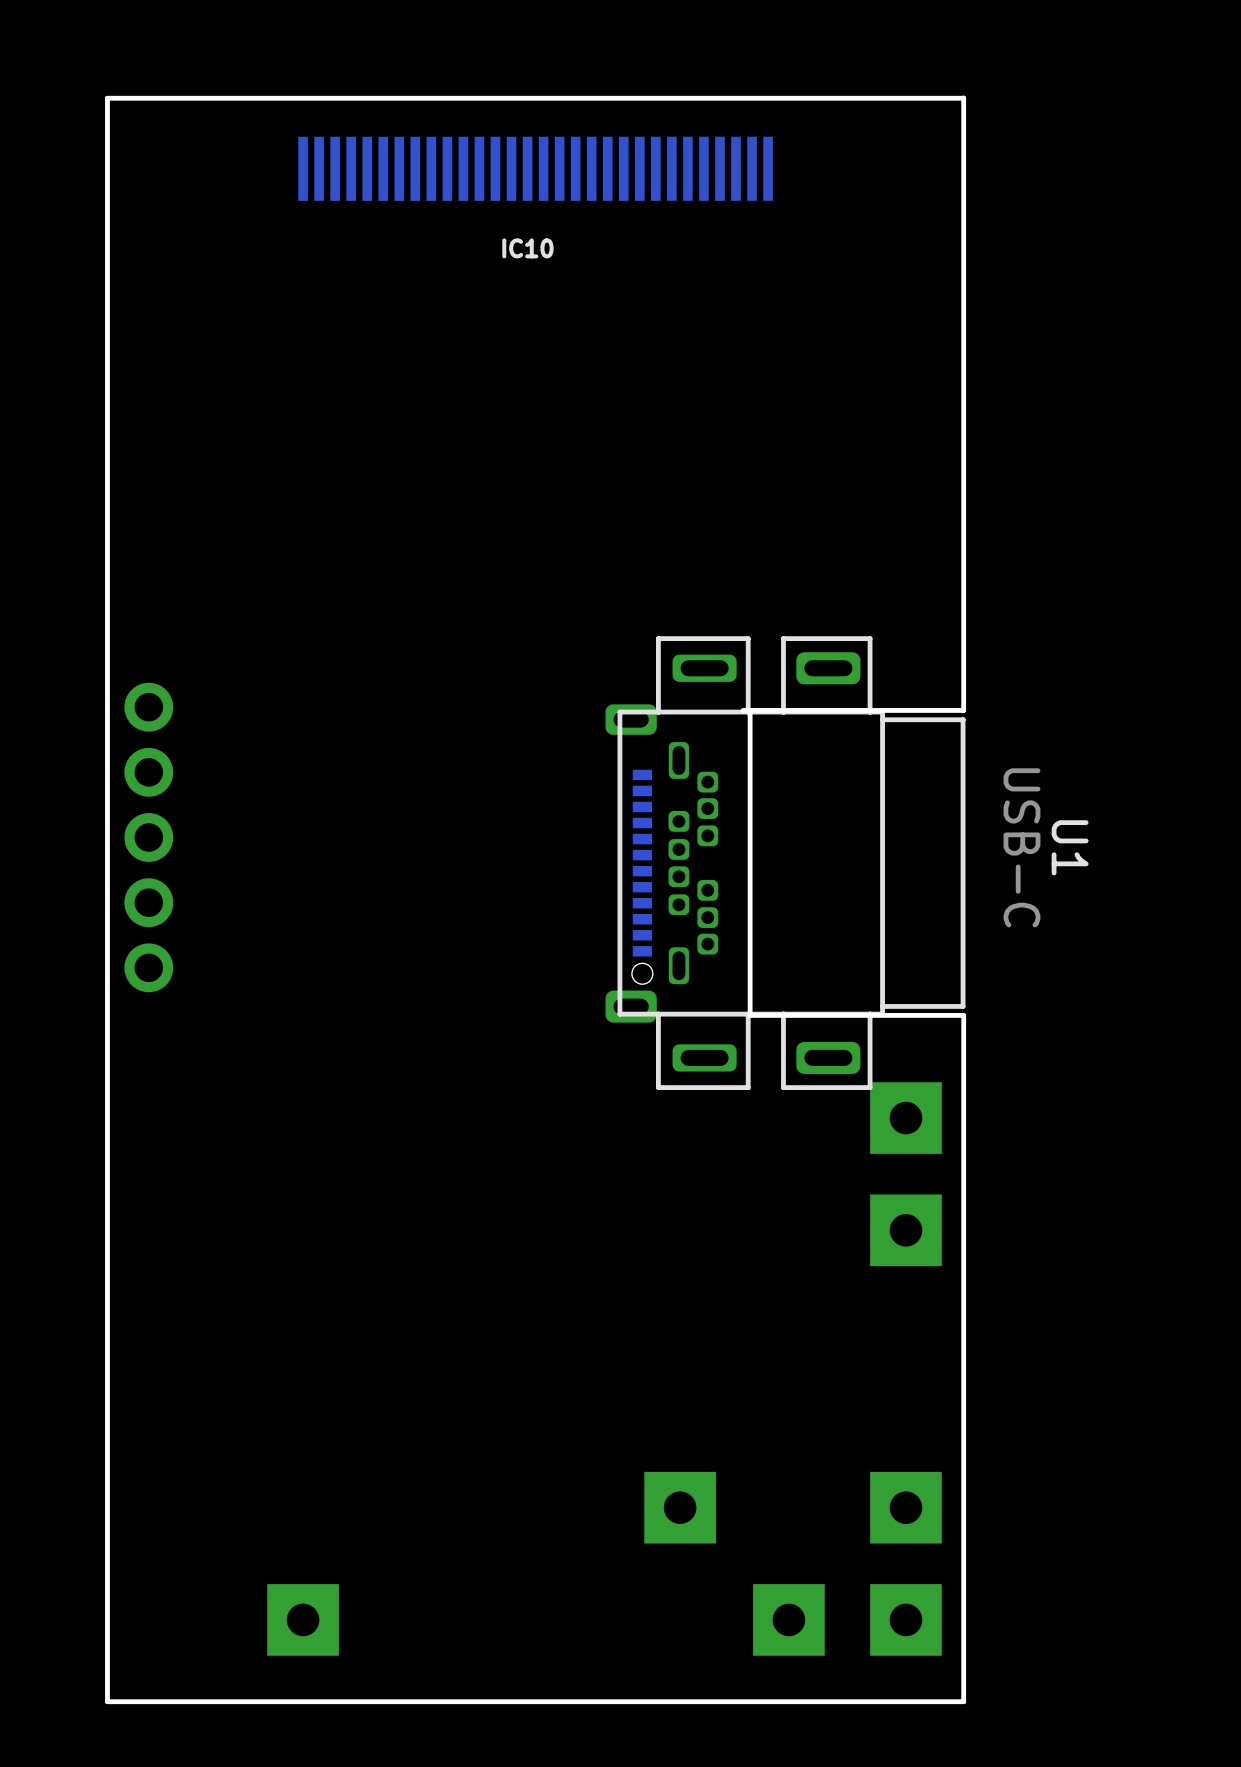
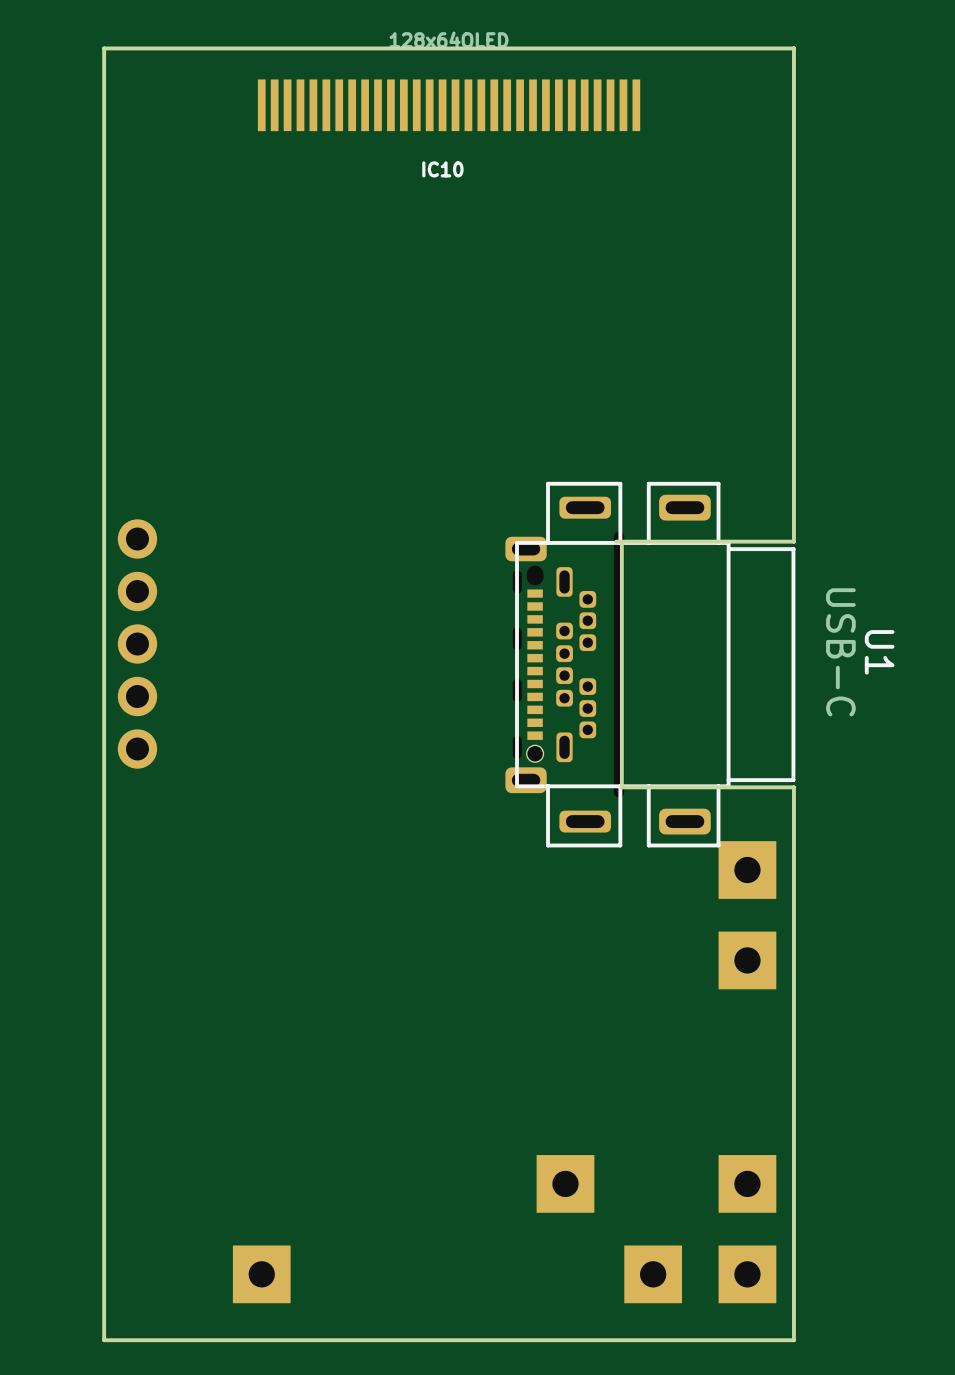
IC10 value: none -> 128x64OLED (449, 39)

